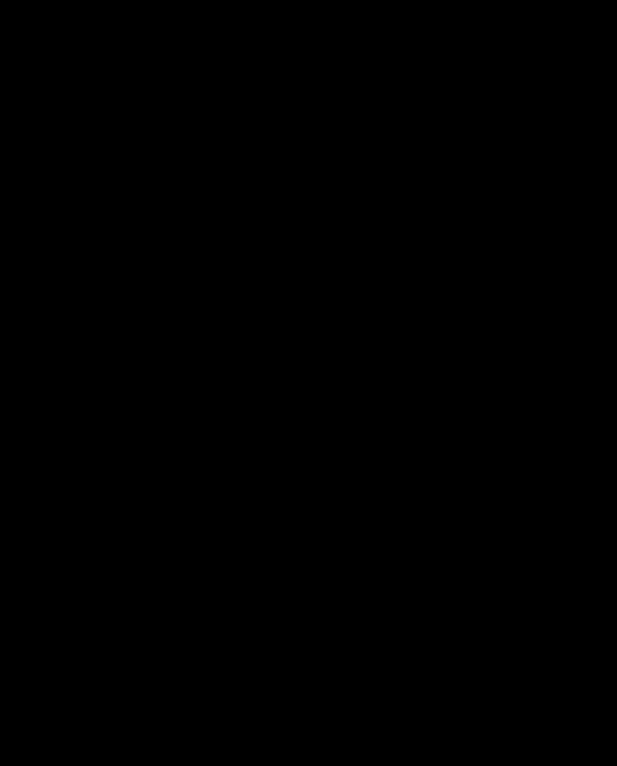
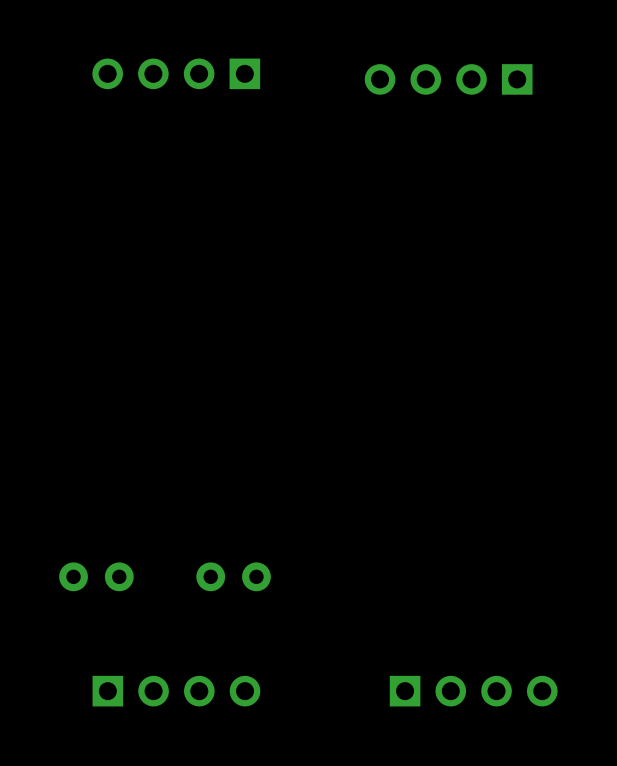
part: none -> (176, 73)
part: none -> (448, 79)
part: none -> (96, 576)
part: none -> (233, 576)
part: none -> (176, 691)
part: none -> (473, 691)

